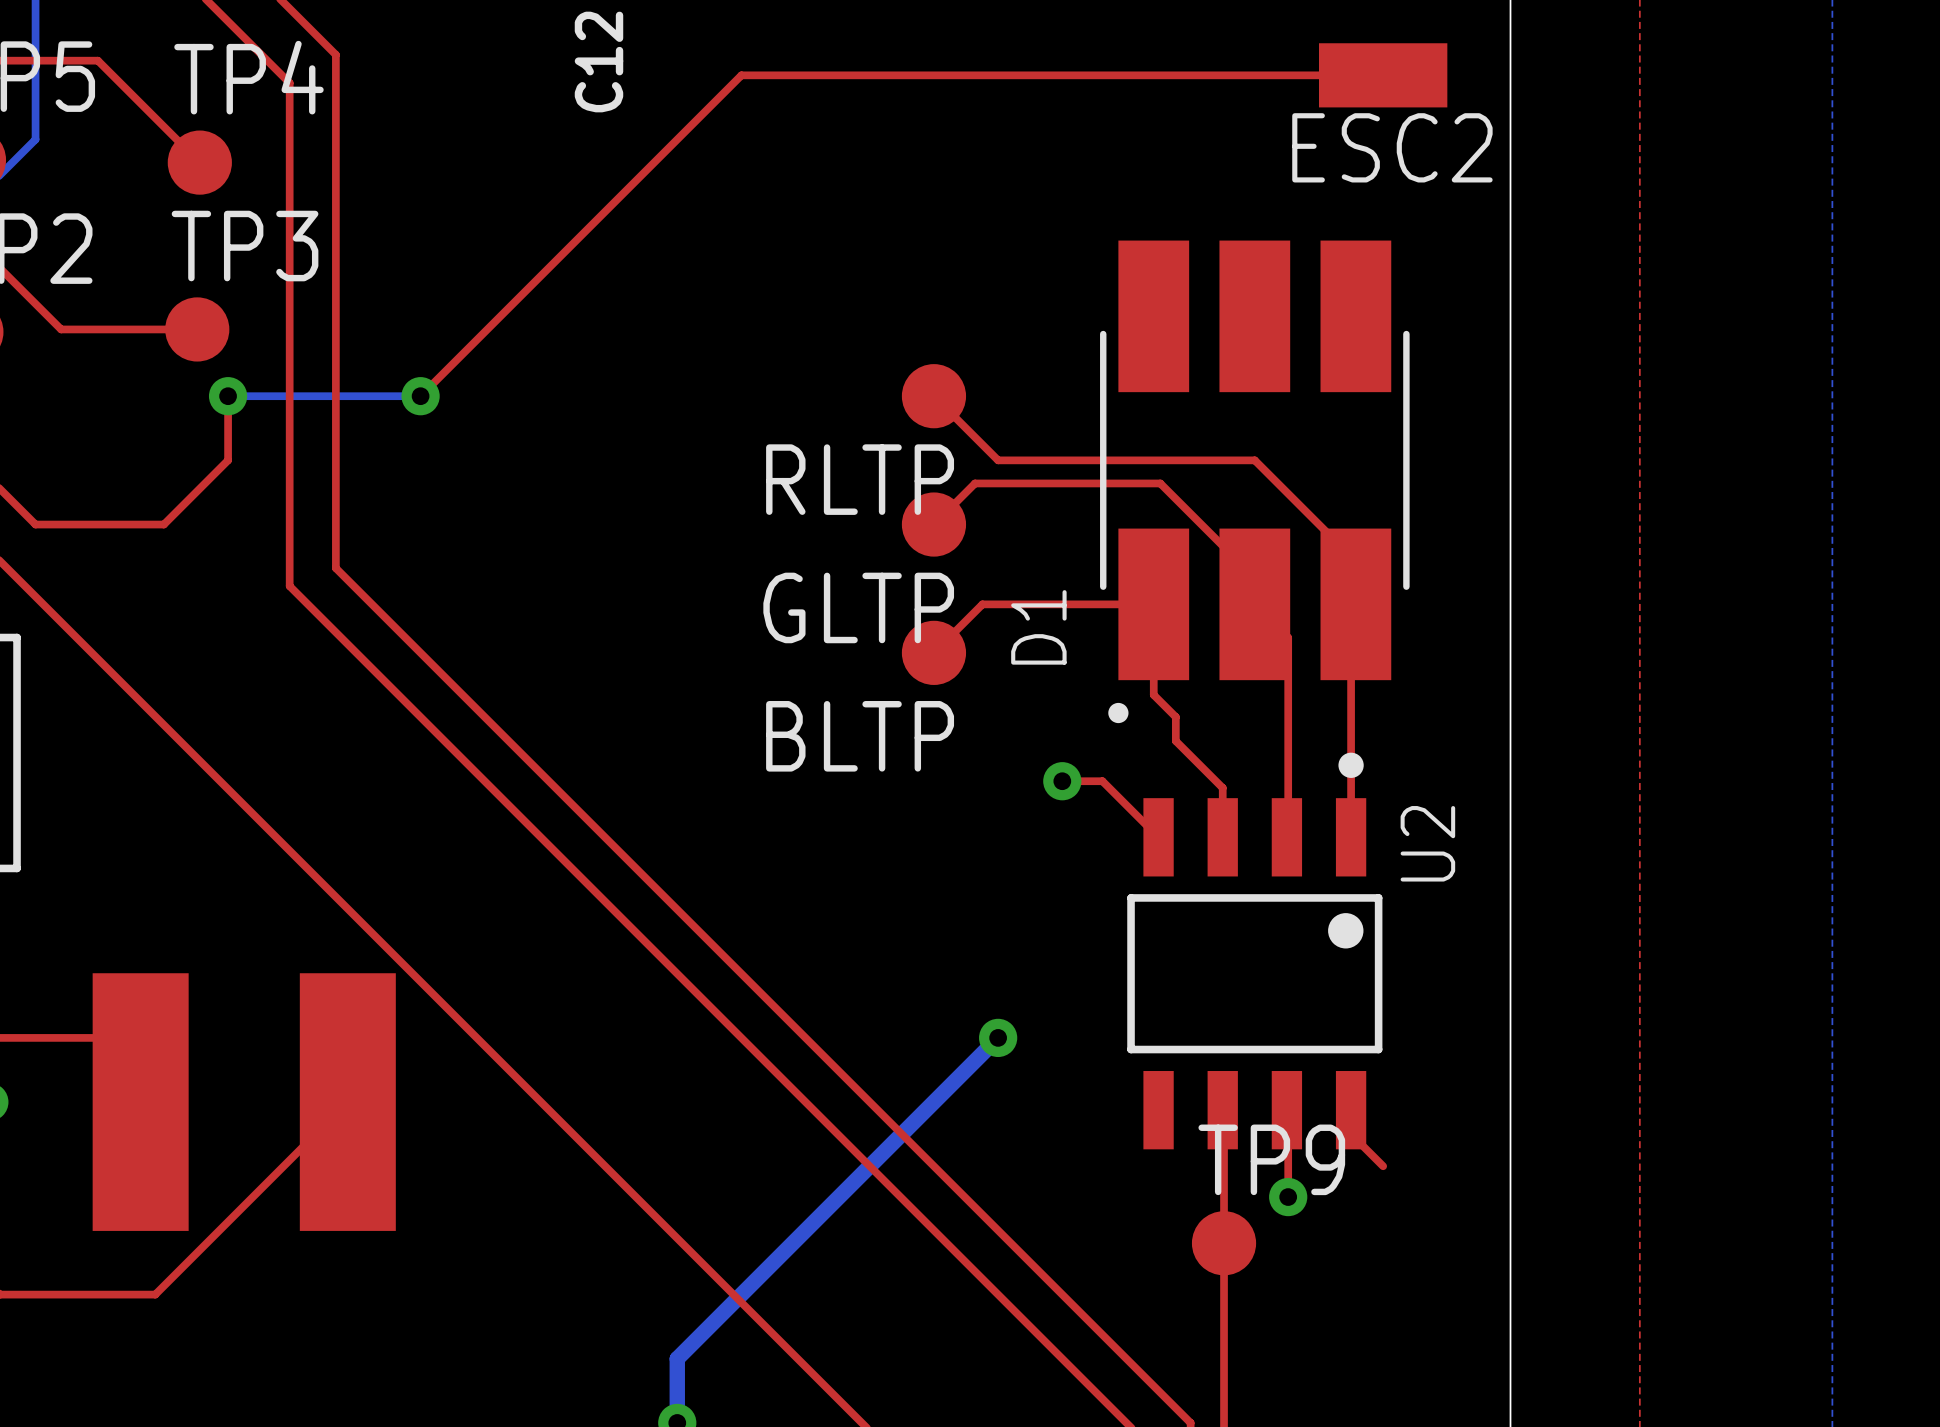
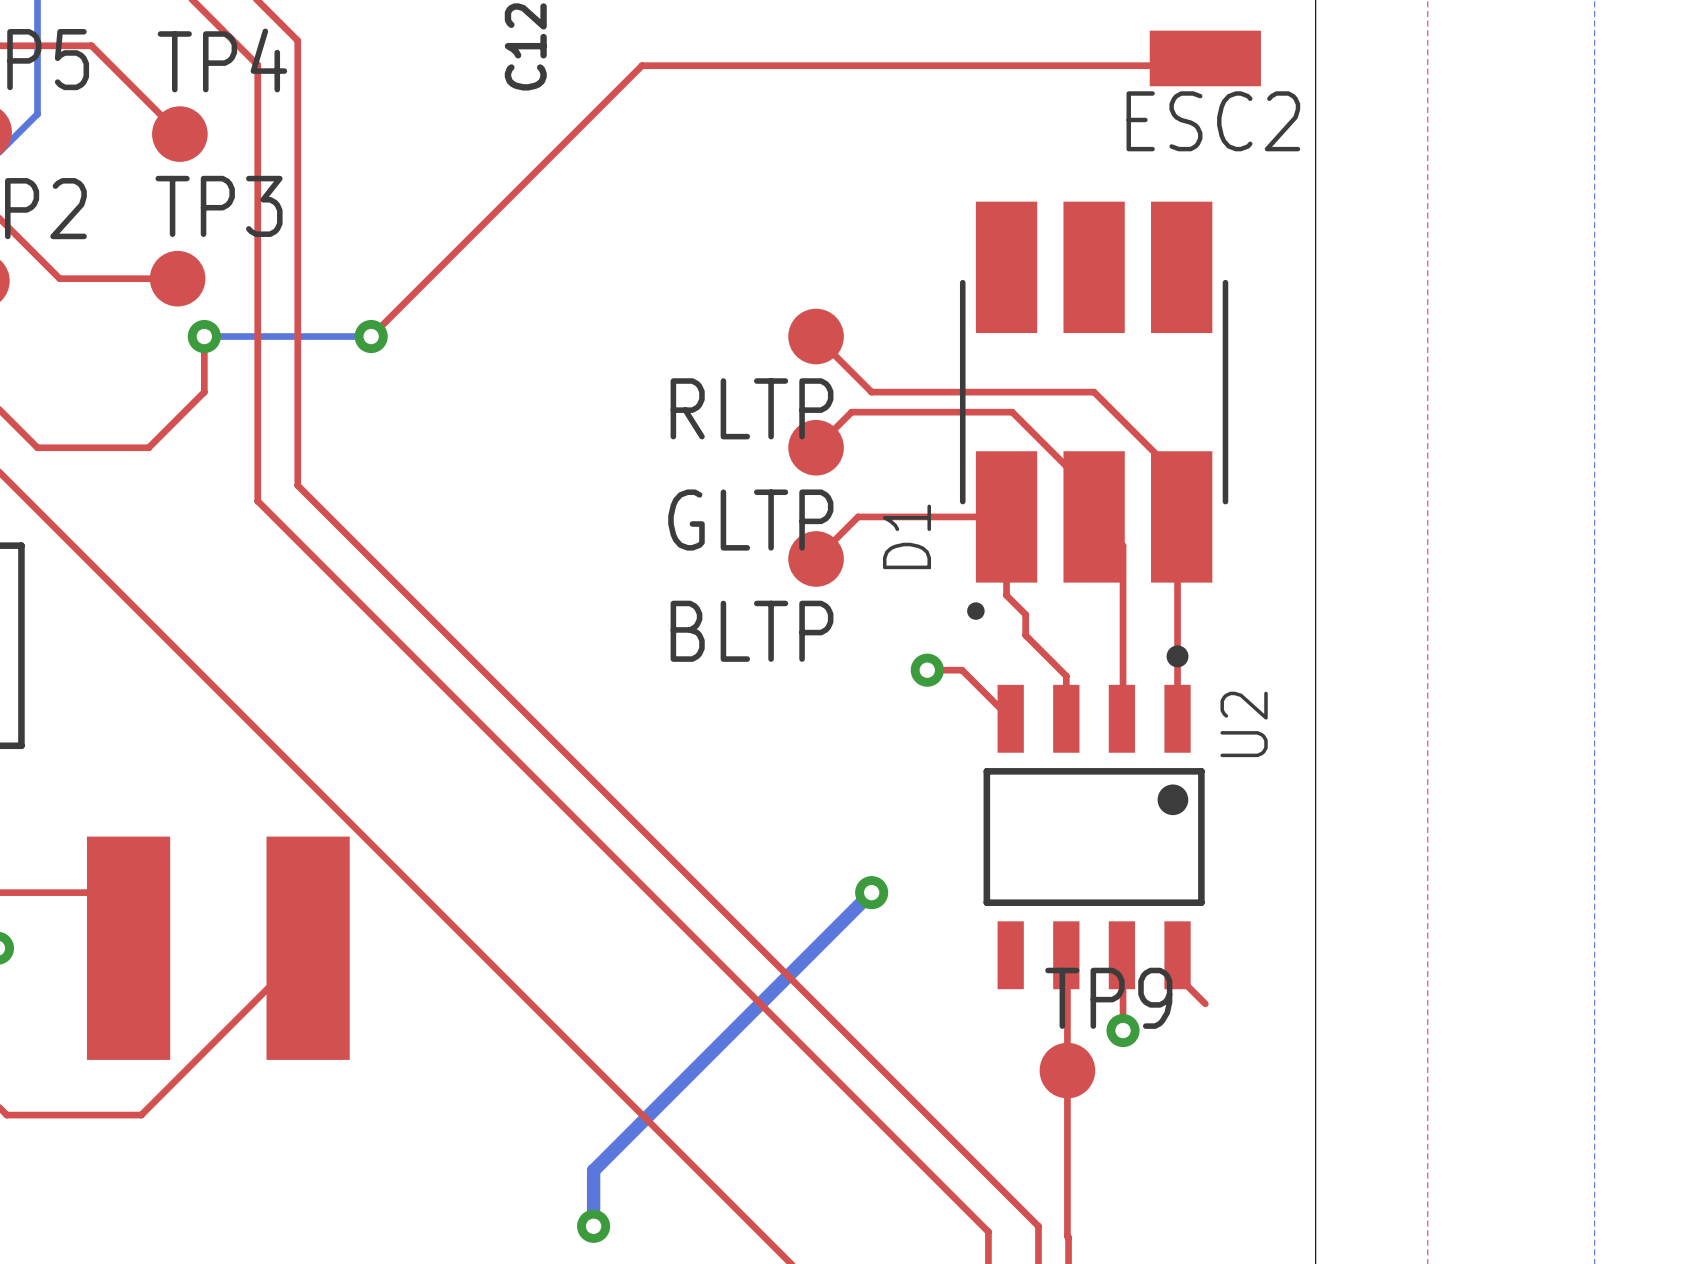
top track: (1383, 75) (741, 75) (733, 83) -> (1220, 74) (1211, 65) (642, 65)

